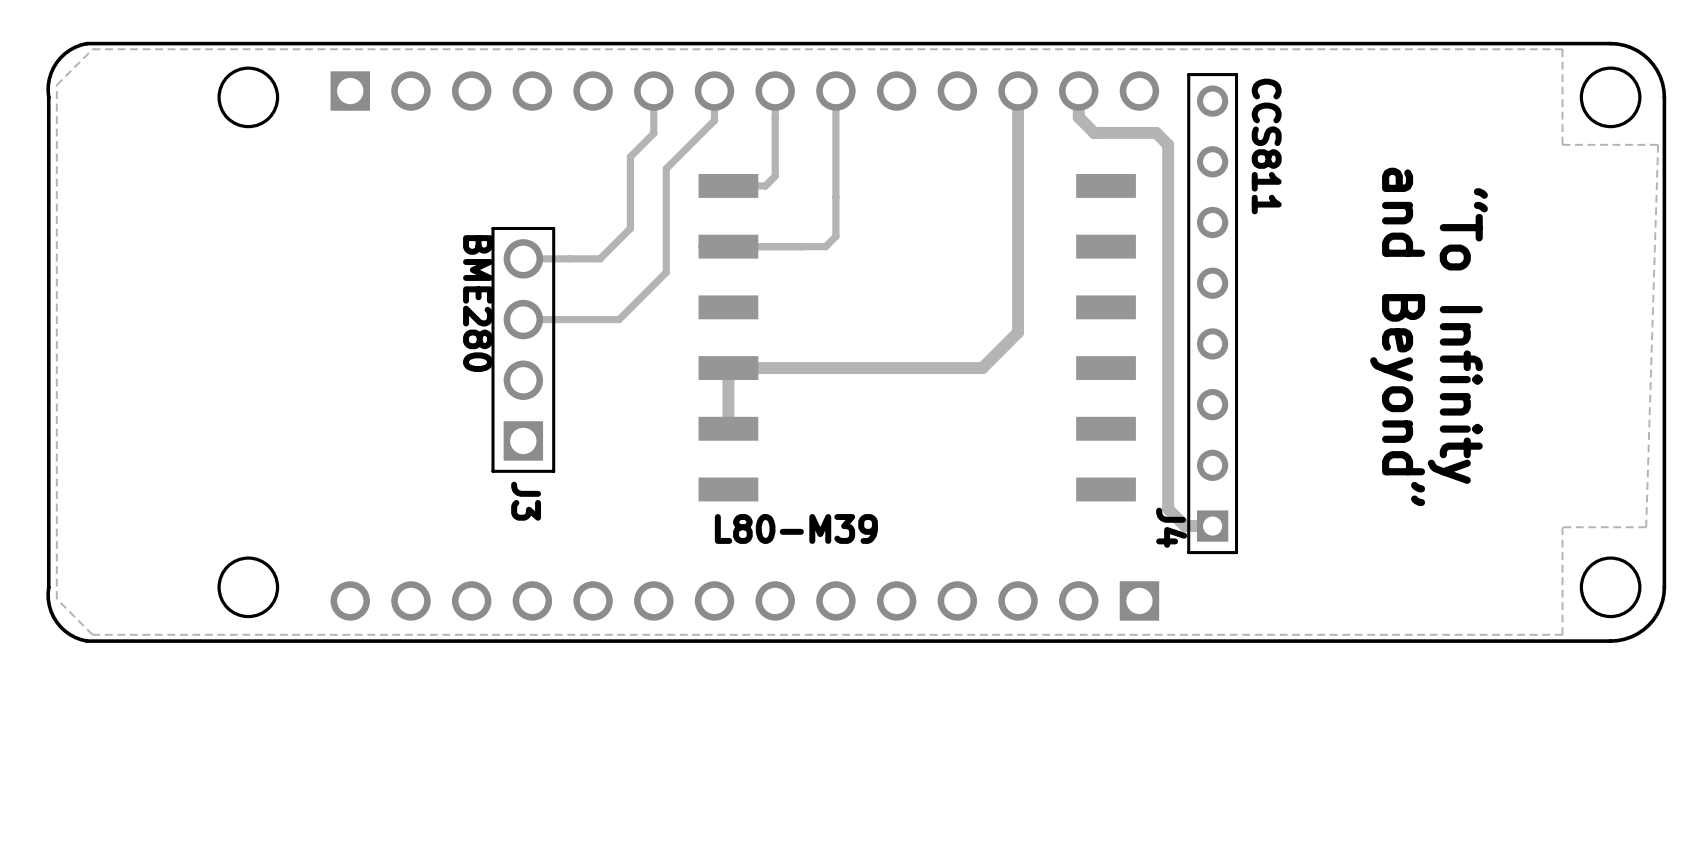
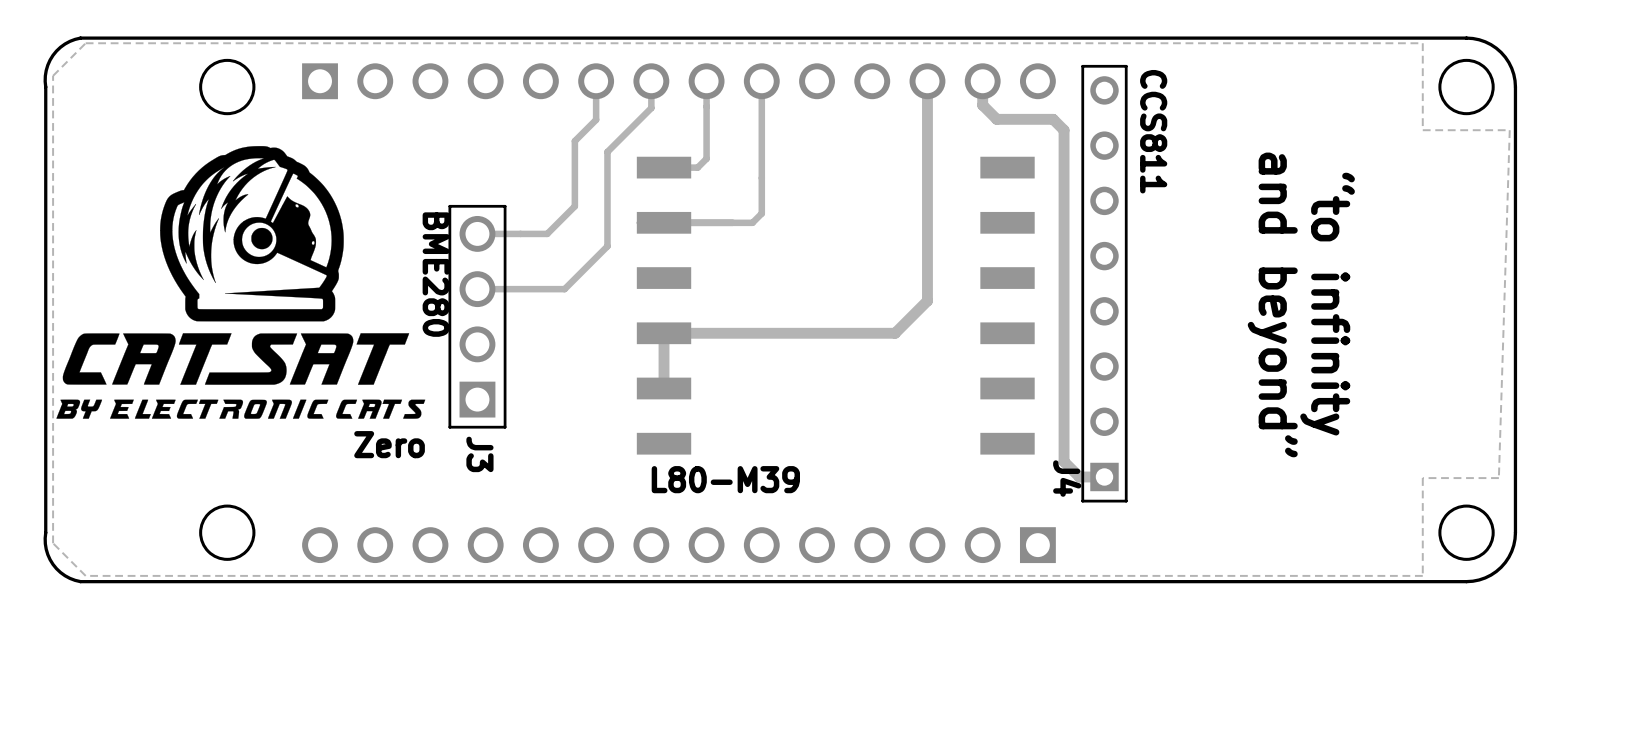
drawing: none -> [56, 146, 426, 419]
text: and Beyond” (1397, 336) -> and beyond” (1272, 304)
text: “To Infinity (1457, 336) -> “to infinity (1327, 304)
text: none -> Zero (389, 444)

